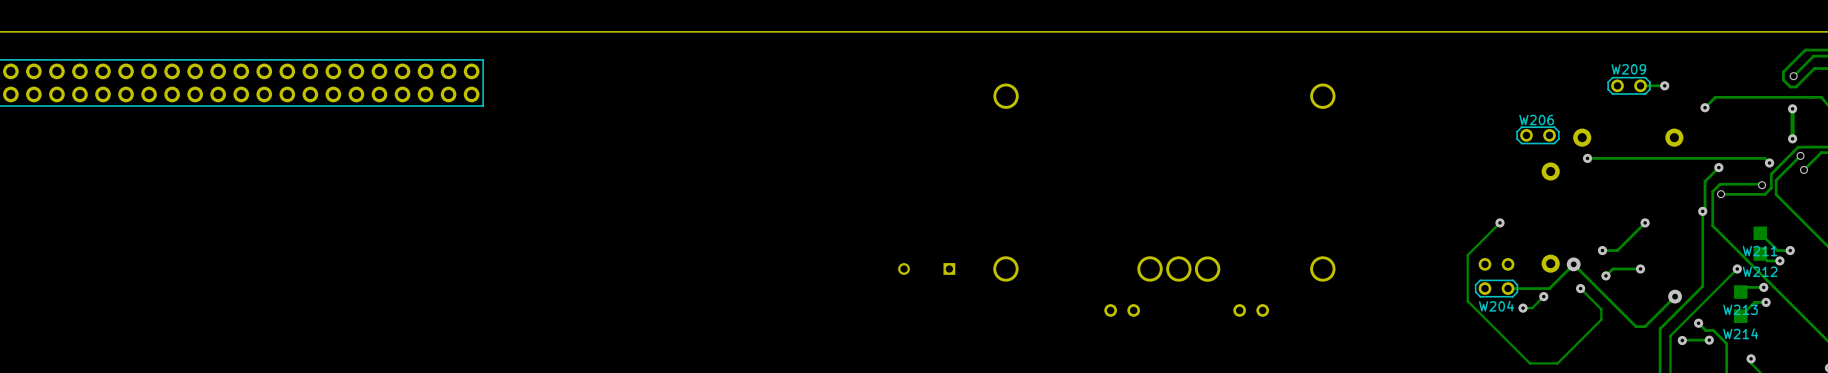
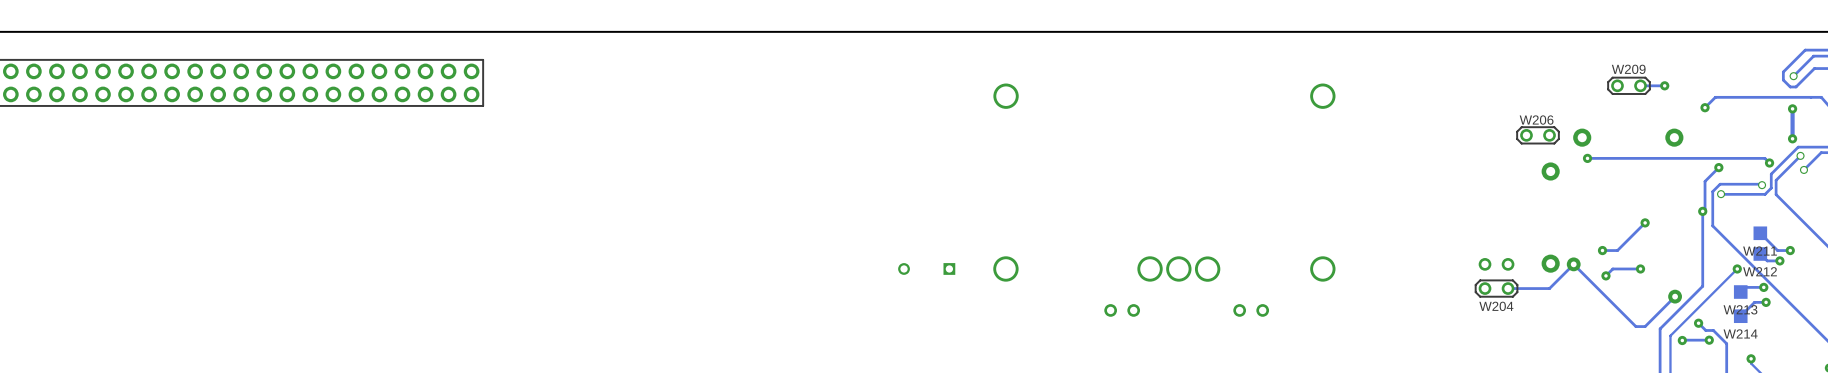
track: (1499, 222) (1467, 255) (1467, 301) (1529, 363) (1557, 363) (1601, 319) (1601, 309) (1580, 288) -> none
via: (1499, 222) -> none
via: (1580, 288) -> none
track: (1543, 296) (1532, 308) (1523, 308) -> none
via: (1543, 296) -> none
via: (1523, 308) -> none

